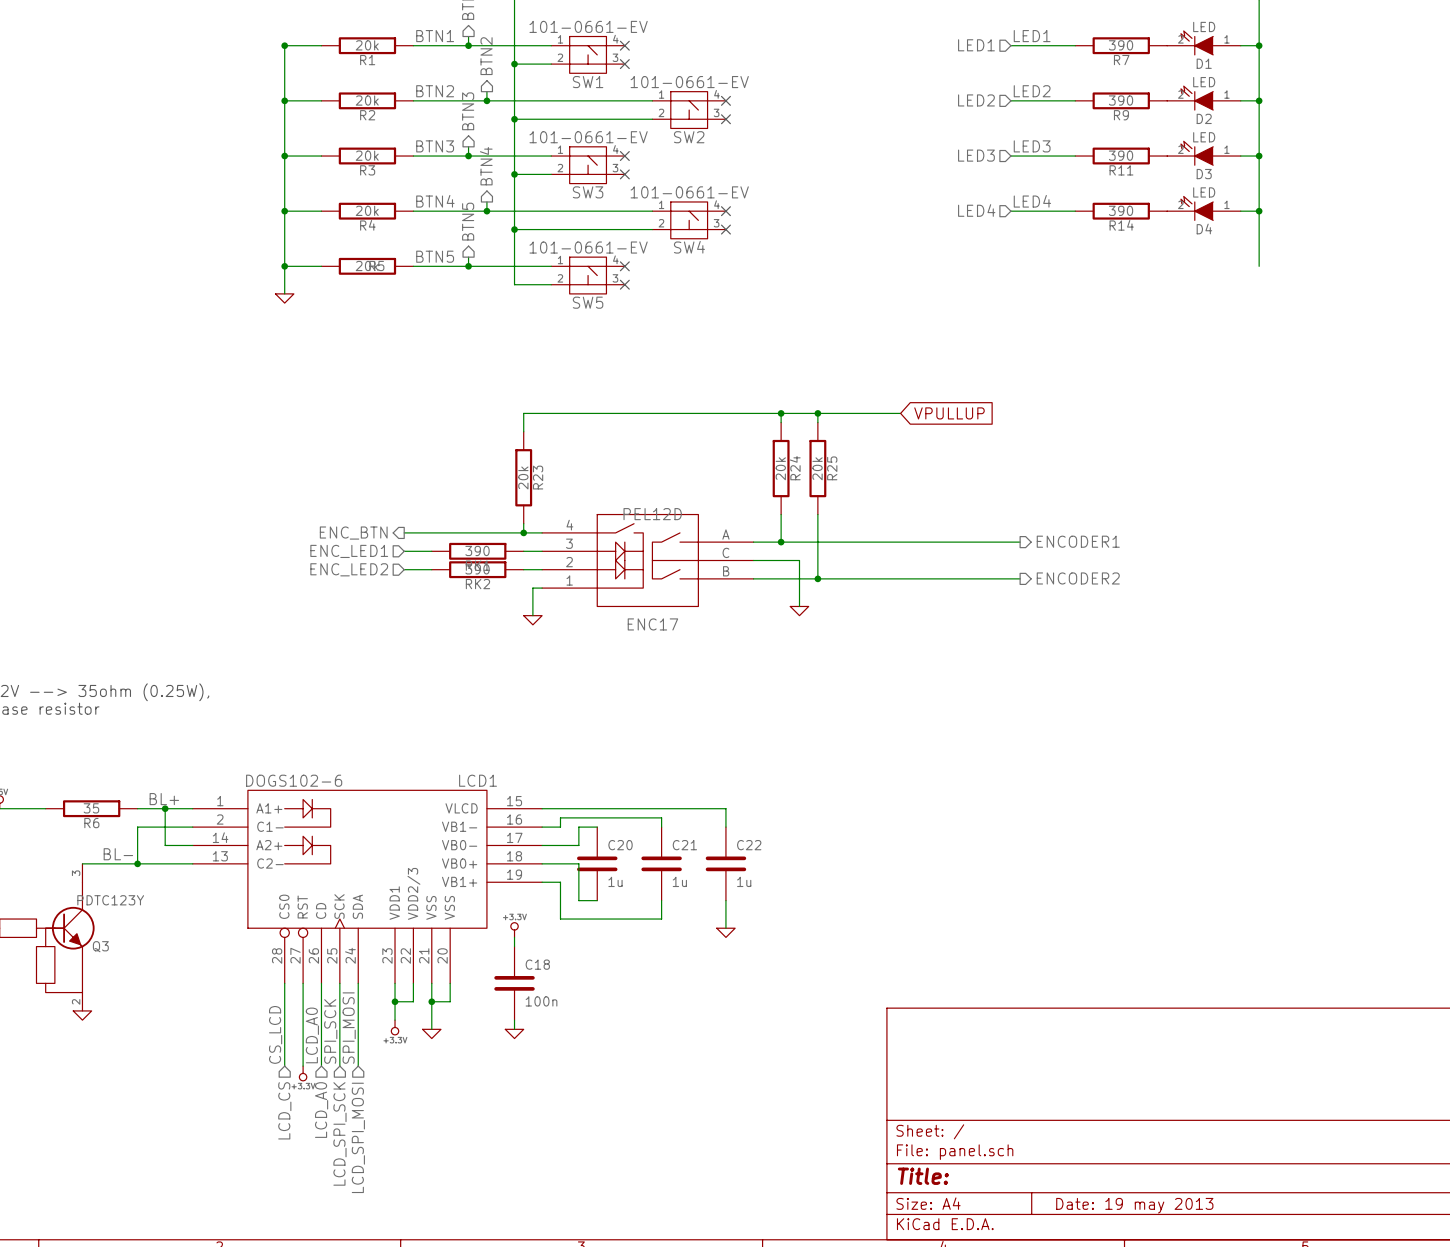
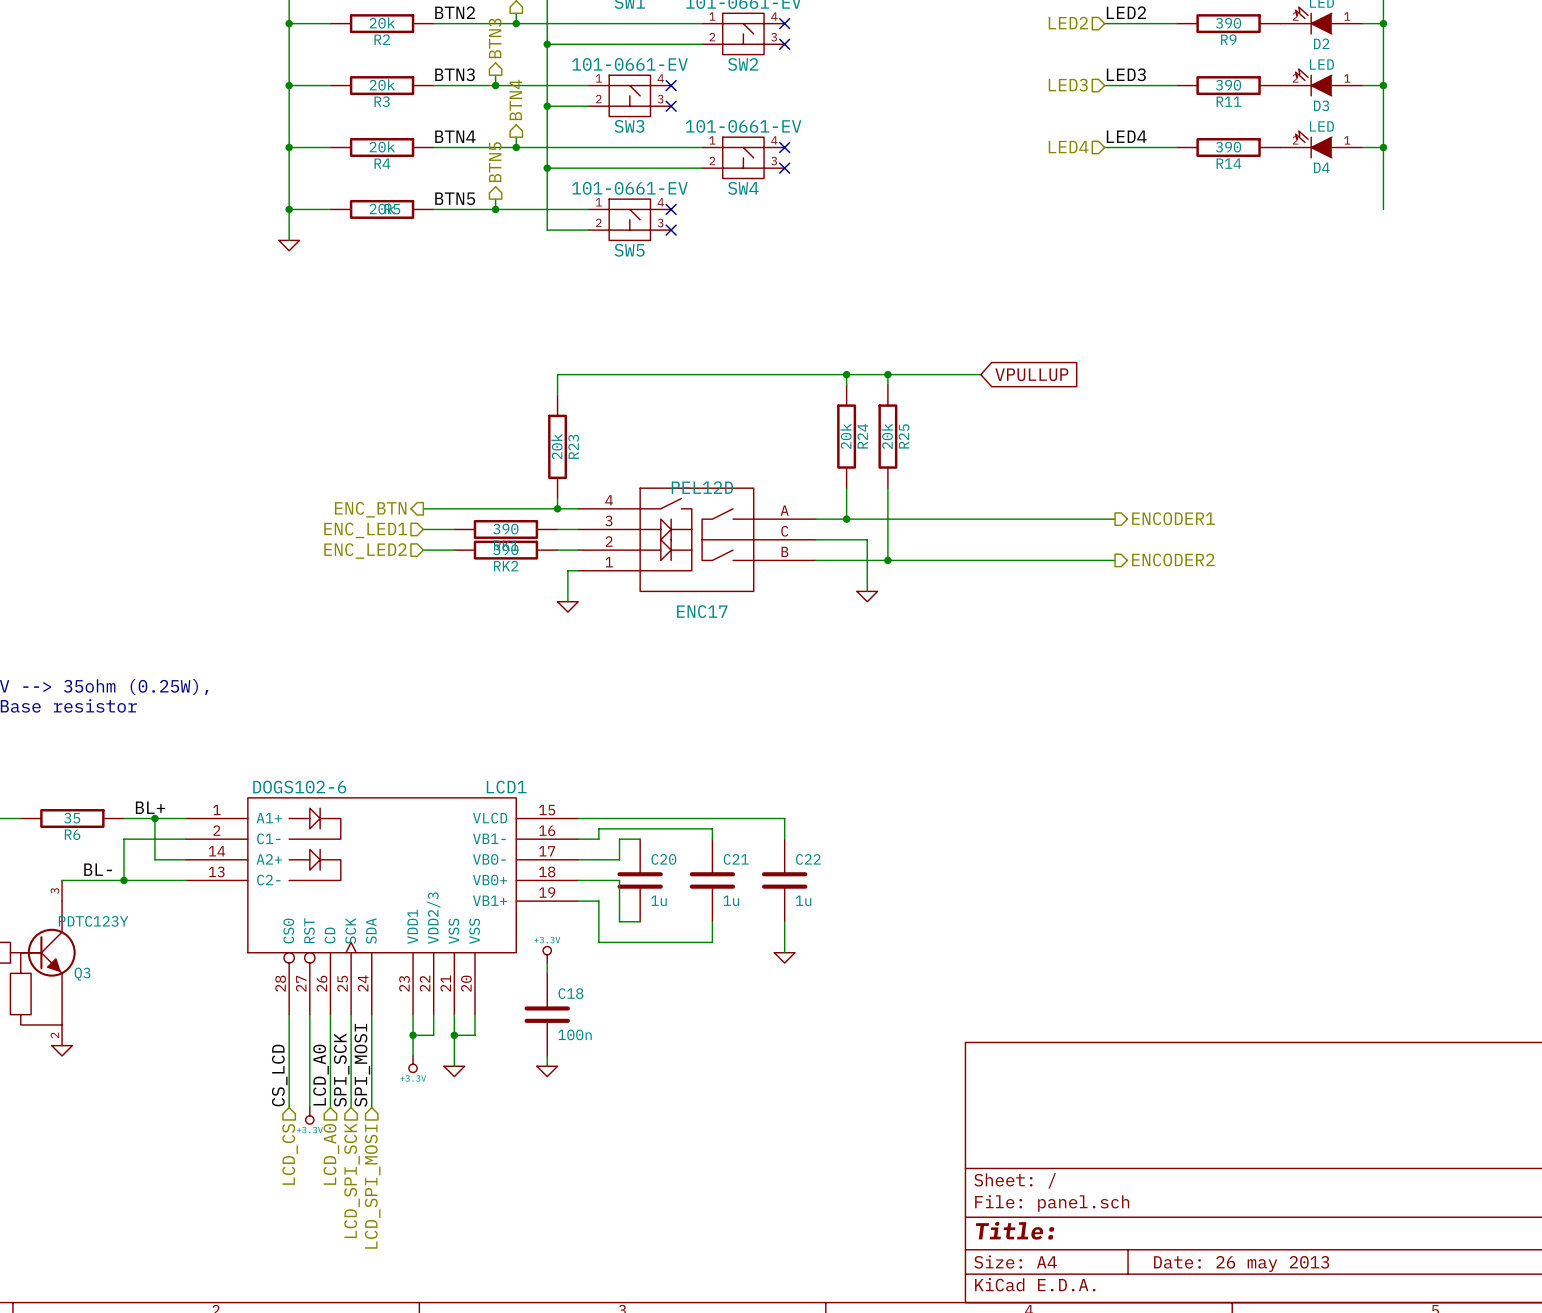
title block: Date: 19 may 2013 (1134, 1205) -> Date: 26 may 2013 (1241, 1263)

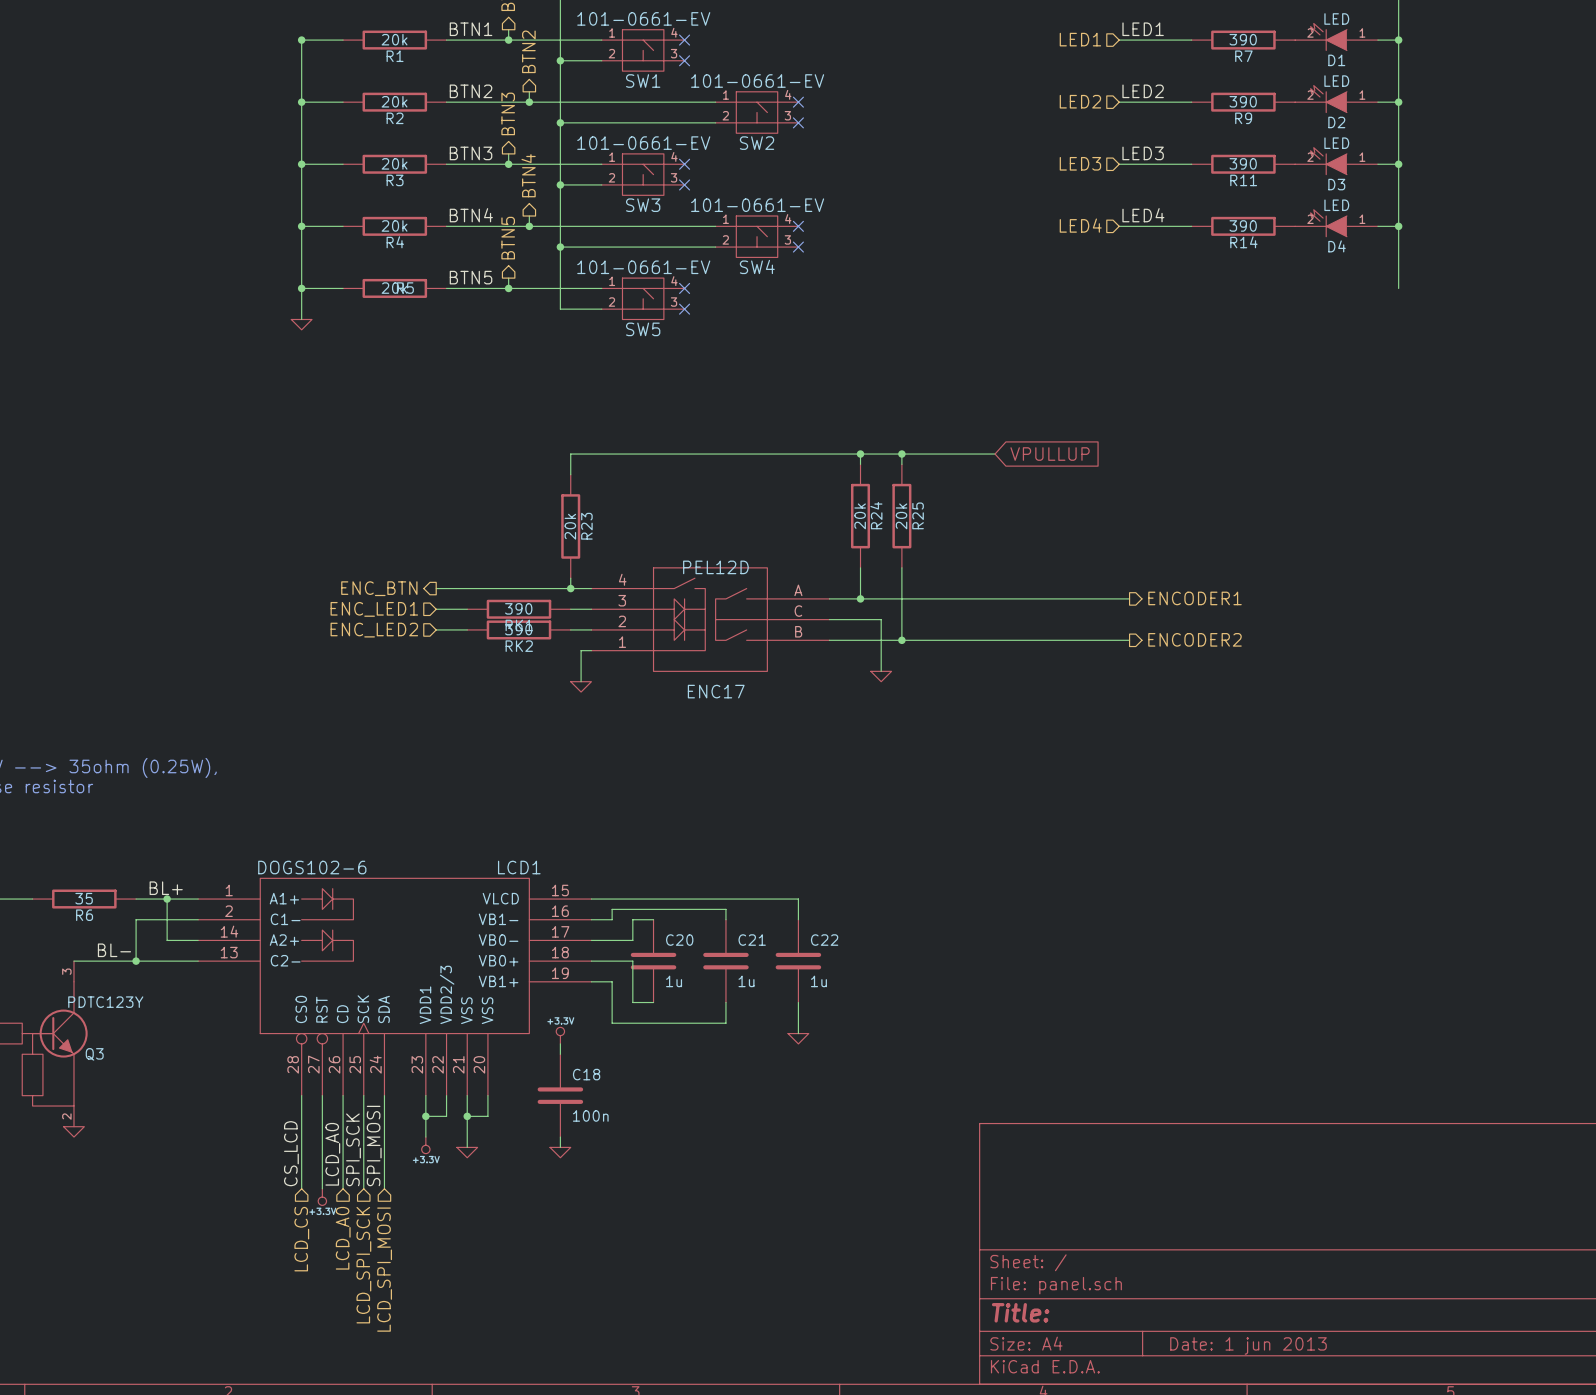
title block: Date: 26 may 2013 (1241, 1263) -> Date: 1 jun 2013 (1248, 1345)

